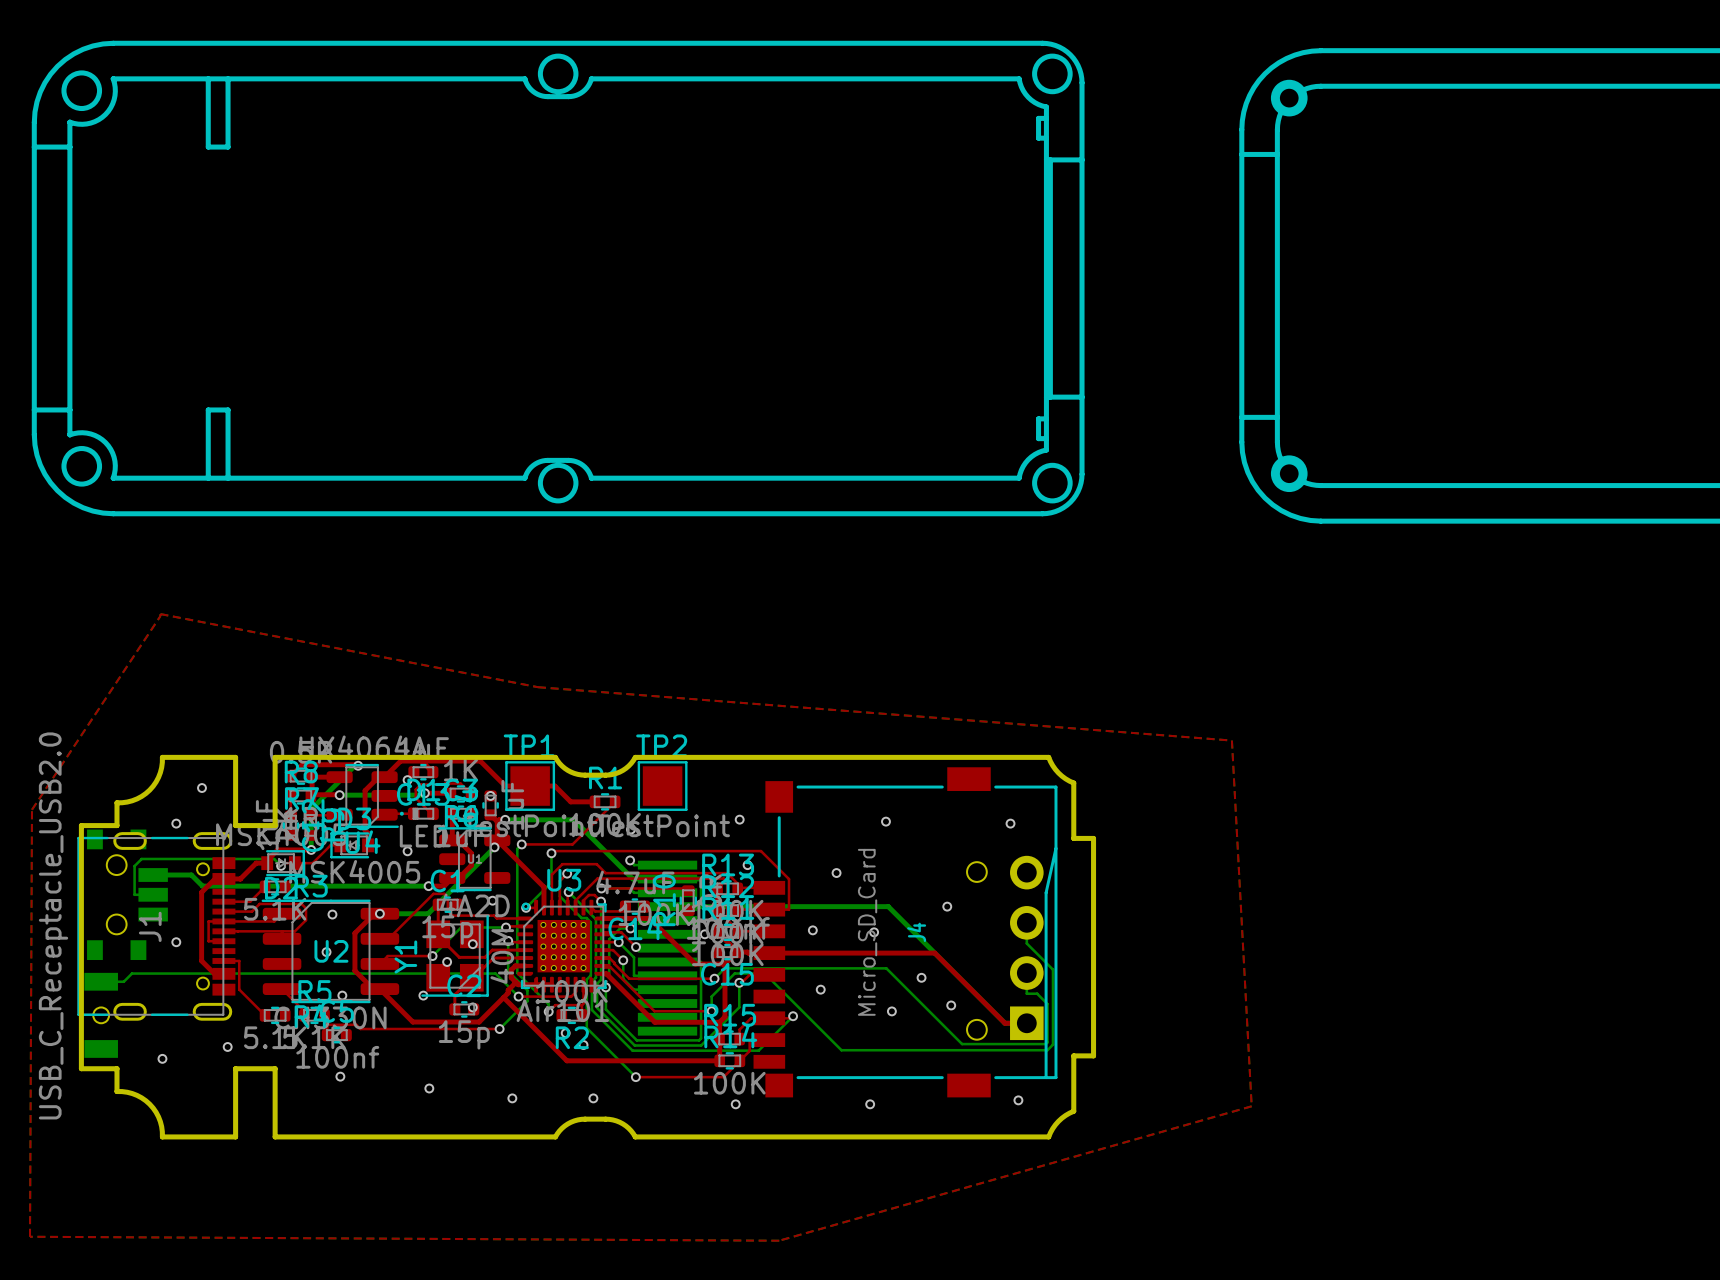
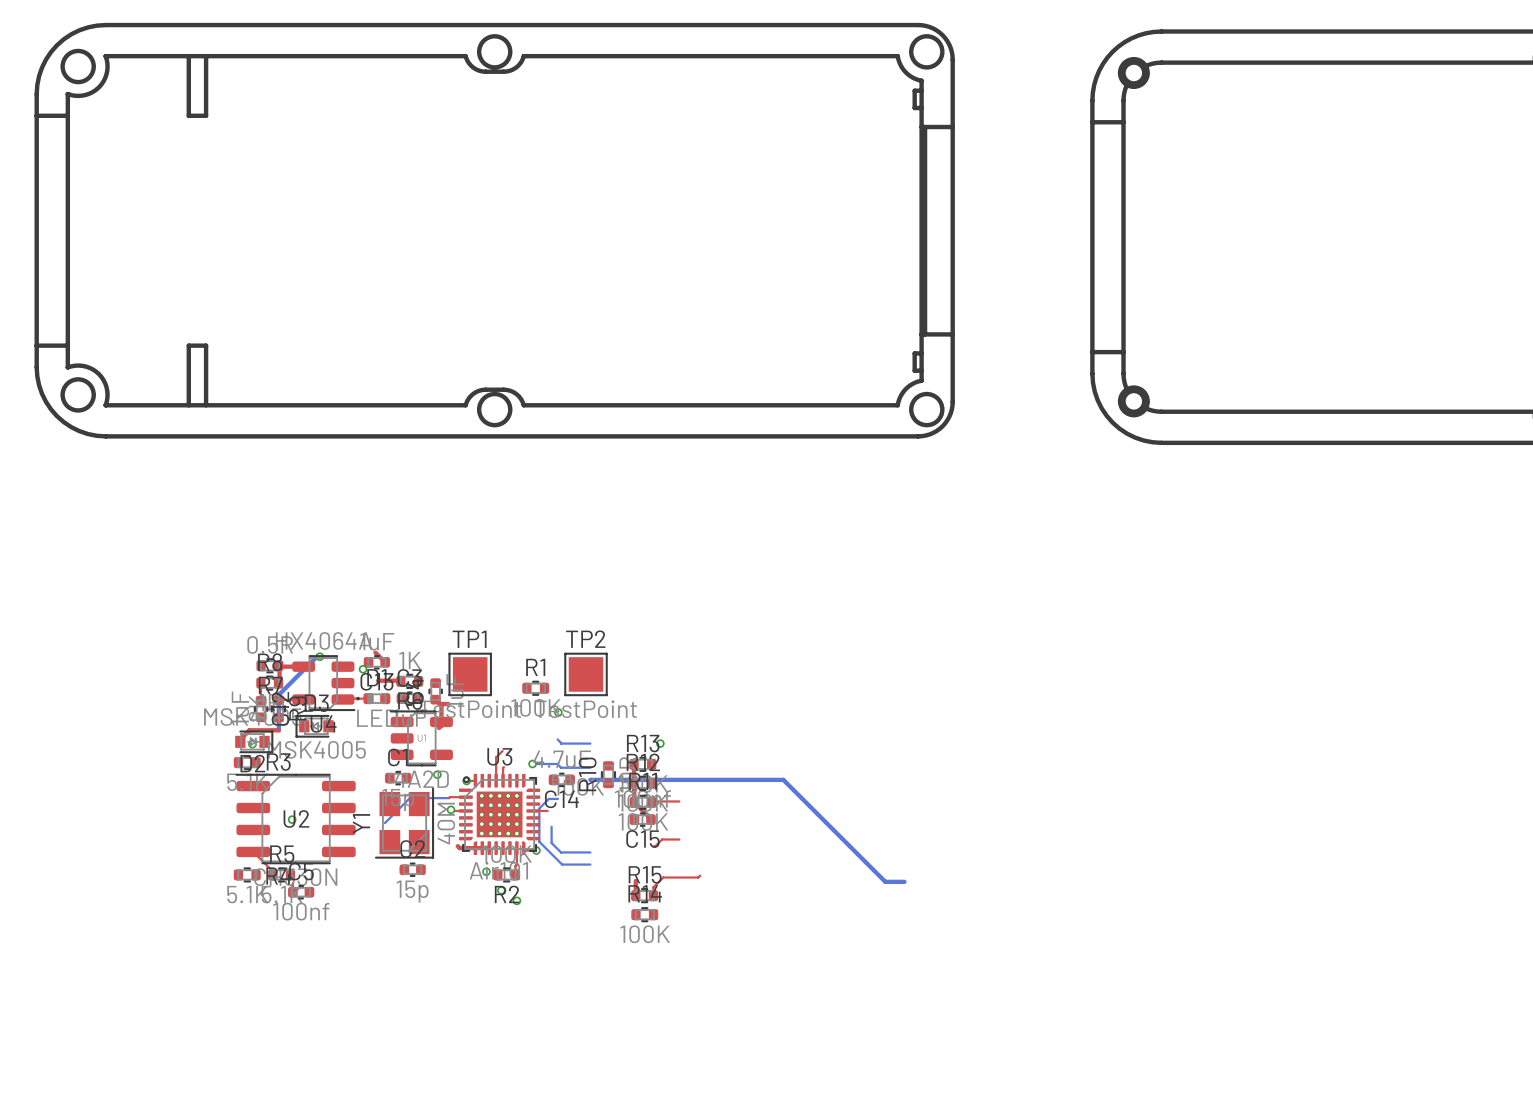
top zone outline: (160, 614) (31, 809) (30, 1236) (779, 1240) (1251, 1106) (1231, 740) (538, 687) (160, 614) -> none
board edge: (162, 757) (235, 757) (235, 825) (275, 825) (275, 757) (555, 757) (567, 770) (585, 775) (616, 773) (628, 766) (635, 757) (1048, 757) (1058, 772) (1073, 783) (1073, 838) (1093, 838) (1093, 1055) (1073, 1055) (1073, 1111) (1058, 1121) (1048, 1136) (635, 1136) (622, 1123) (605, 1119) (574, 1120) (564, 1125) (555, 1136) (275, 1136) (275, 1068) (235, 1068) (235, 1136) (162, 1136) (158, 1116) (149, 1104) (132, 1093) (116, 1091) (116, 1068) (81, 1068) (81, 825) (116, 825) (116, 802) (137, 798) (149, 790) (158, 777) (162, 757) -> none
top track: (358, 765) (302, 764) (290, 776) -> none
via: (201, 788) -> none
bottom track: (424, 793) (422, 795) (339, 795) -> none
via: (424, 793) -> none
top track: (471, 793) (460, 783) (420, 784) (415, 789) (415, 798) (432, 813) -> none
top track: (339, 795) (310, 795) -> none
via: (339, 795) -> none
via: (490, 795) -> none
top track: (594, 801) (570, 801) (554, 786) (505, 786) (480, 761) (400, 761) (384, 777) (378, 777) (365, 790) (365, 830) (368, 833) (368, 845) -> none
top track: (615, 801) (572, 844) (521, 844) -> none
top track: (451, 813) (452, 840) (458, 840) (471, 853) (471, 865) (458, 877) (452, 877) (444, 886) (428, 886) -> none
bottom track: (505, 819) (573, 819) (632, 878) (702, 878) (702, 906) -> none
via: (505, 819) -> none
via: (739, 819) -> none
via: (885, 821) -> none
via: (176, 823) -> none
via: (1010, 823) -> none
top track: (497, 840) (543, 887) (543, 907) -> none
bottom track: (521, 844) (517, 848) (517, 973) (548, 1004) (548, 1011) -> none
via: (521, 844) -> none
top track: (340, 845) (330, 845) (312, 863) (285, 863) (281, 865) -> none
bottom track: (494, 847) (428, 913) (379, 913) -> none
via: (494, 847) -> none
via: (311, 849) -> none
via: (407, 851) -> none
bottom track: (551, 853) (551, 882) (526, 907) -> none
top track: (551, 853) (553, 851) (761, 851) (789, 879) (789, 909) (737, 910) -> none
via: (551, 853) -> none
via: (630, 860) -> none
top track: (267, 863) (256, 863) (240, 878) (215, 878) (201, 892) (201, 960) (214, 973) (223, 973) -> none
bottom track: (281, 865) (274, 858) (141, 858) (134, 866) (134, 894) (153, 894) -> none
bottom track: (567, 873) (559, 880) (559, 896) (581, 918) (586, 918) (590, 922) (590, 975) (586, 979) (586, 1028) (635, 1077) -> none
via: (567, 873) -> none
via: (836, 873) -> none
bottom track: (153, 875) (191, 875) (202, 886) (428, 886) -> none
top track: (265, 886) (250, 901) (223, 901) -> none
via: (428, 886) -> none
top track: (769, 887) (737, 888) (737, 883) (727, 873) (605, 873) (596, 864) (562, 864) (551, 874) (551, 907) -> none
top track: (601, 888) (686, 888) (688, 890) -> none
bottom track: (568, 892) (595, 919) (595, 977) (591, 981) (591, 1009) (632, 1050) (758, 1050) (793, 1016) -> none
via: (568, 892) -> none
part: (127, 894) -> none
bottom track: (601, 901) (601, 979) (597, 983) (597, 1007) (634, 1045) (701, 1045) (739, 1007) (739, 982) -> none
top track: (601, 901) (594, 895) (588, 895) (583, 900) (583, 907) -> none
via: (601, 901) -> none
top track: (438, 904) (438, 936) (459, 957) (485, 957) (492, 950) (525, 950) -> none
top track: (625, 906) (620, 911) (595, 911) (591, 907) -> none
via: (947, 906) -> none
top track: (575, 907) (575, 900) (597, 878) (723, 878) (727, 881) (727, 919) (737, 932) -> none
top track: (223, 911) (252, 911) (259, 903) (301, 903) (306, 908) (306, 920) (294, 931) (223, 931) -> none
top track: (282, 913) (274, 921) (208, 921) (208, 941) (223, 941) -> none
top track: (379, 913) (374, 913) (354, 933) (354, 970) (373, 989) (379, 989) (412, 1022) (479, 1022) (515, 982) (511, 977) (511, 970) (515, 965) (525, 965) -> none
via: (379, 913) -> none
via: (332, 914) -> none
top track: (525, 918) (496, 918) (494, 915) (452, 915) (447, 911) (447, 897) (444, 893) (433, 893) (388, 938) (379, 938) -> none
top track: (602, 918) (649, 918) (695, 964) (724, 964) -> none
bottom track: (1026, 922) (1026, 943) (1053, 969) (1053, 1044) (1047, 1050) (841, 1050) (764, 973) (734, 973) (711, 996) (711, 1011) -> none
J1: USB_C_Receptacle_USB2.0 (156, 926) -> none
top track: (602, 926) (628, 926) (630, 928) -> none
via: (506, 927) -> none
via: (630, 928) -> none
via: (812, 930) -> none
via: (874, 932) -> none
J4: Micro_SD_Card (905, 932) -> none
top track: (602, 934) (604, 932) (621, 932) (636, 947) -> none
via: (704, 934) -> none
bottom track: (508, 940) (508, 971) (527, 990) (527, 1001) (499, 1029) -> none
via: (176, 942) -> none
bottom track: (618, 942) (634, 957) (634, 975) (667, 975) -> none
via: (618, 942) -> none
via: (472, 944) -> none
via: (636, 947) -> none
part: (1026, 947) -> none
part: (667, 948) -> none
top track: (602, 950) (613, 950) (623, 960) -> none
top track: (432, 956) (387, 956) (379, 963) -> none
via: (432, 956) -> none
top track: (525, 958) (493, 958) (454, 994) (454, 1009) -> none
top track: (602, 958) (609, 958) (629, 978) (714, 978) -> none
top track: (223, 960) (239, 960) (239, 989) (265, 1015) -> none
via: (623, 960) -> none
via: (447, 961) -> none
bottom track: (667, 961) (701, 961) (701, 1038) (699, 1040) (636, 1040) (605, 1009) (605, 987) -> none
top track: (724, 964) (736, 952) (934, 953) (1004, 1023) (1026, 1023) -> none
top track: (724, 964) (724, 1016) (719, 1022) (654, 1022) (606, 973) (602, 973) -> none
top track: (602, 965) (610, 967) (654, 1011) (711, 1011) -> none
bottom track: (1026, 973) (1026, 993) (1037, 993) (1047, 1004) (1047, 1042) (1045, 1044) (962, 1044) (886, 968) (724, 968) (714, 978) -> none
via: (921, 977) -> none
via: (714, 978) -> none
bottom track: (103, 981) (123, 981) (132, 973) (495, 973) (518, 996) -> none
via: (739, 982) -> none
top track: (575, 984) (575, 992) (571, 996) (518, 996) -> none
via: (820, 989) -> none
via: (342, 995) -> none
via: (423, 995) -> none
via: (518, 996) -> none
top track: (503, 997) (566, 1060) (719, 1060) (719, 1039) -> none
top track: (581, 1005) (555, 1005) (548, 1011) -> none
via: (951, 1005) -> none
via: (472, 1007) -> none
via: (711, 1011) -> none
via: (891, 1011) -> none
part: (101, 1015) -> none
top track: (324, 1015) (324, 1022) (327, 1024) (356, 1024) (360, 1029) (499, 1029) -> none
via: (793, 1016) -> none
via: (499, 1029) -> none
top track: (769, 1040) (749, 1040) (749, 1051) (723, 1077) (635, 1077) -> none
via: (227, 1046) -> none
via: (162, 1058) -> none
via: (340, 1076) -> none
via: (635, 1077) -> none
via: (429, 1088) -> none
via: (512, 1098) -> none
via: (593, 1098) -> none
via: (1018, 1100) -> none
via: (735, 1104) -> none
via: (870, 1104) -> none

